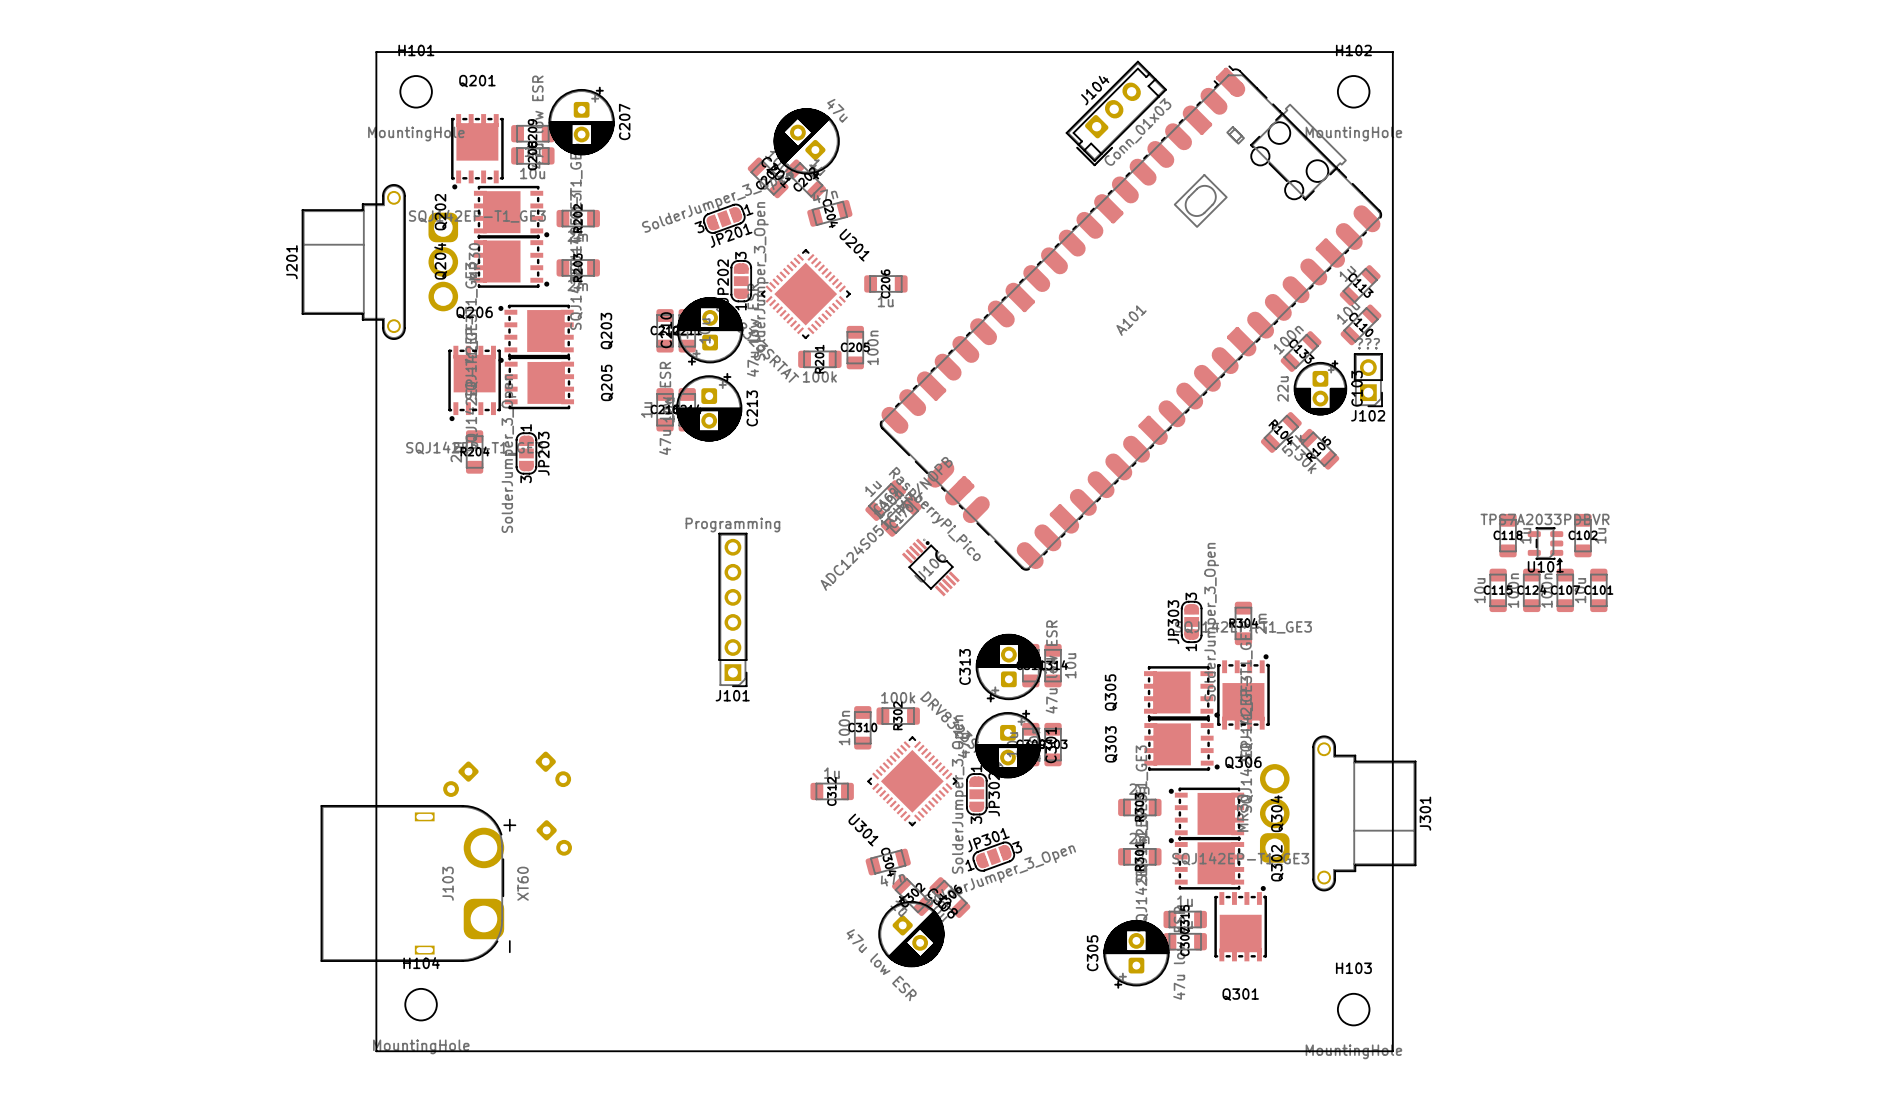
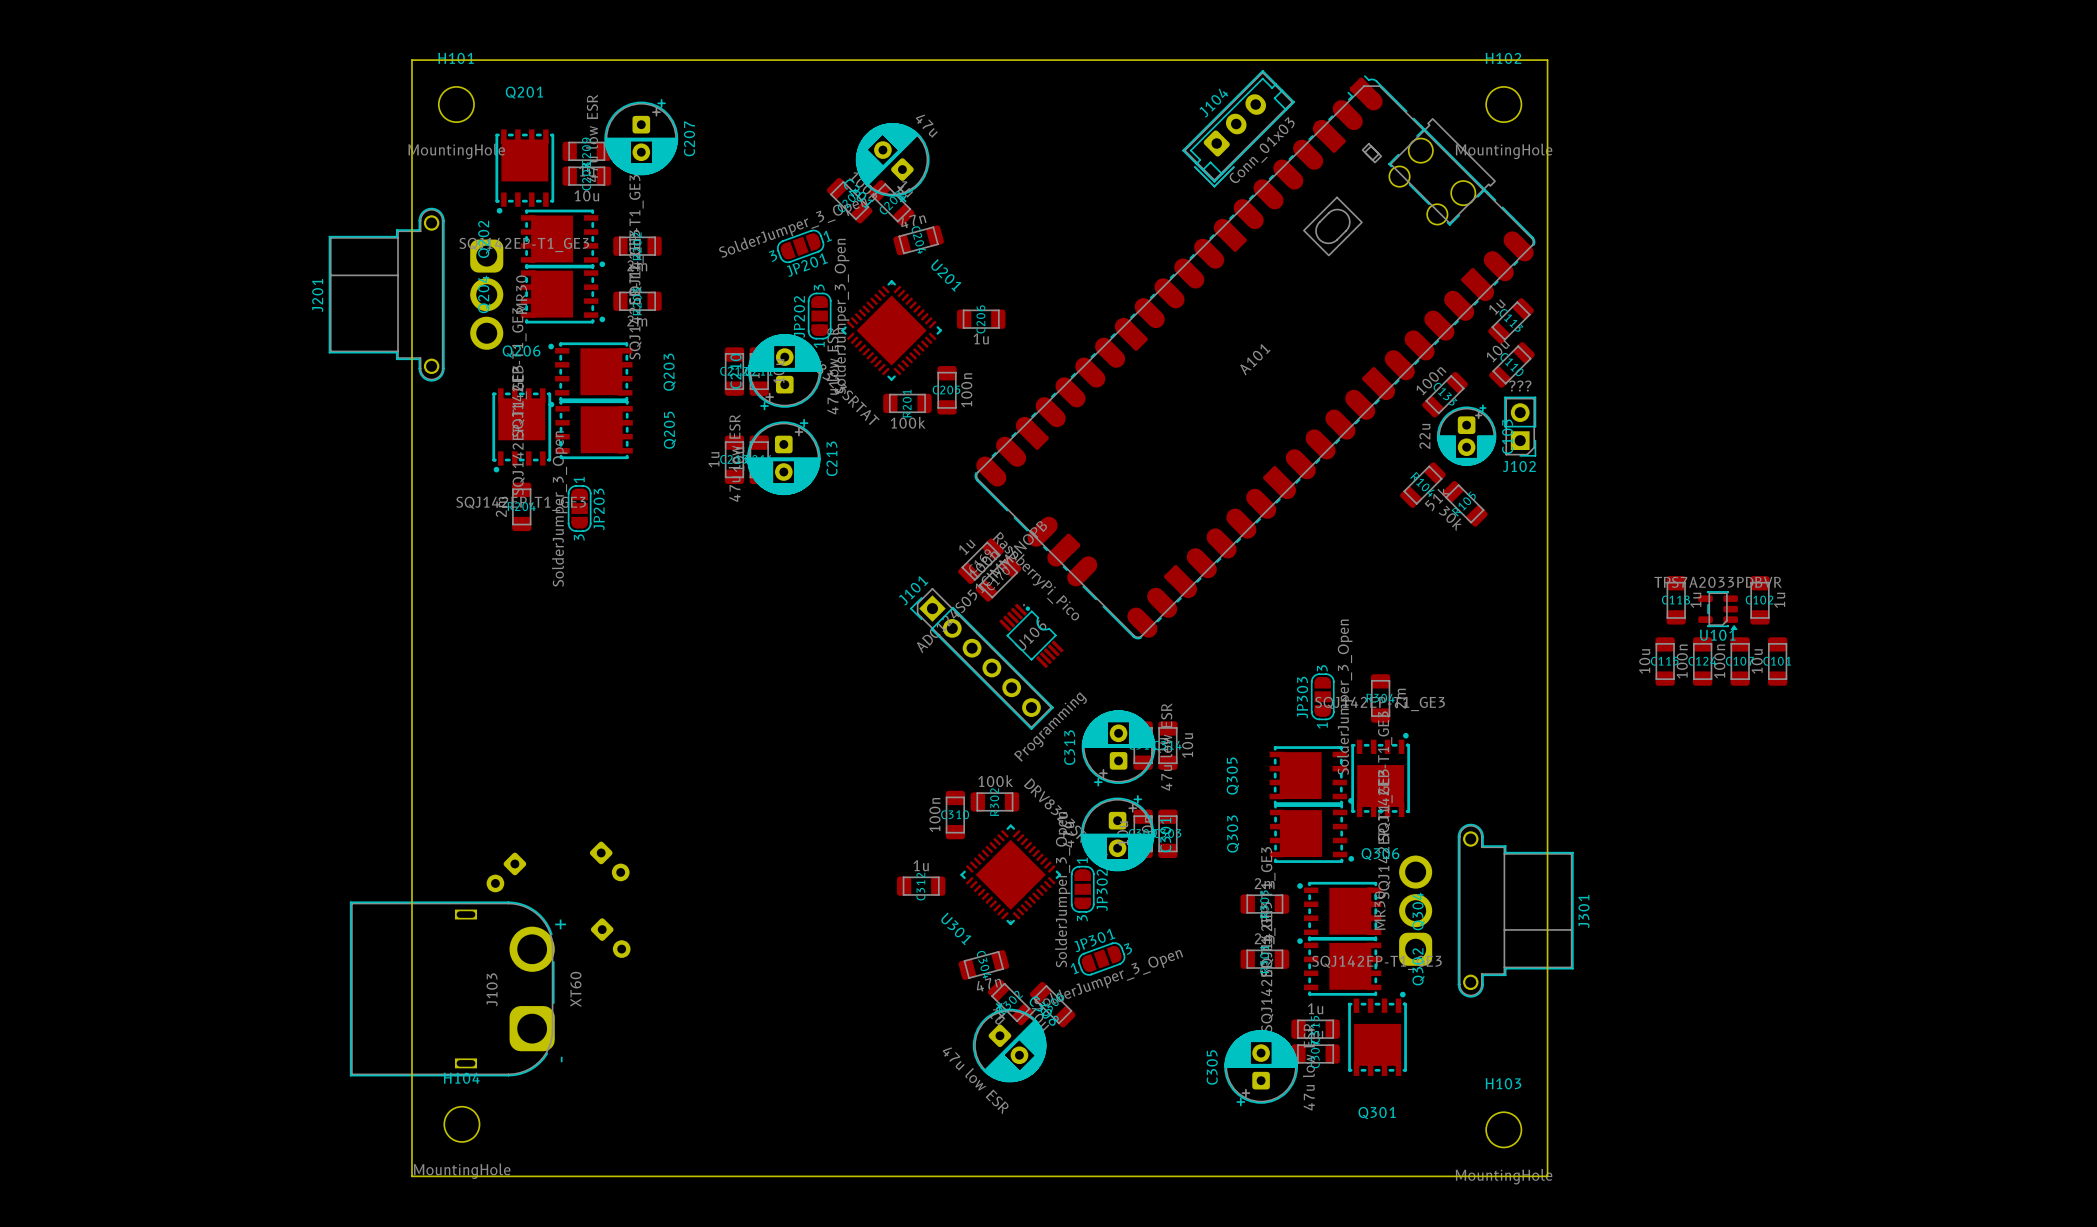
J101 rotation: 0° (732, 609) -> 135° clockwise (981, 659)
J101 position: (732, 609) -> (981, 659)

